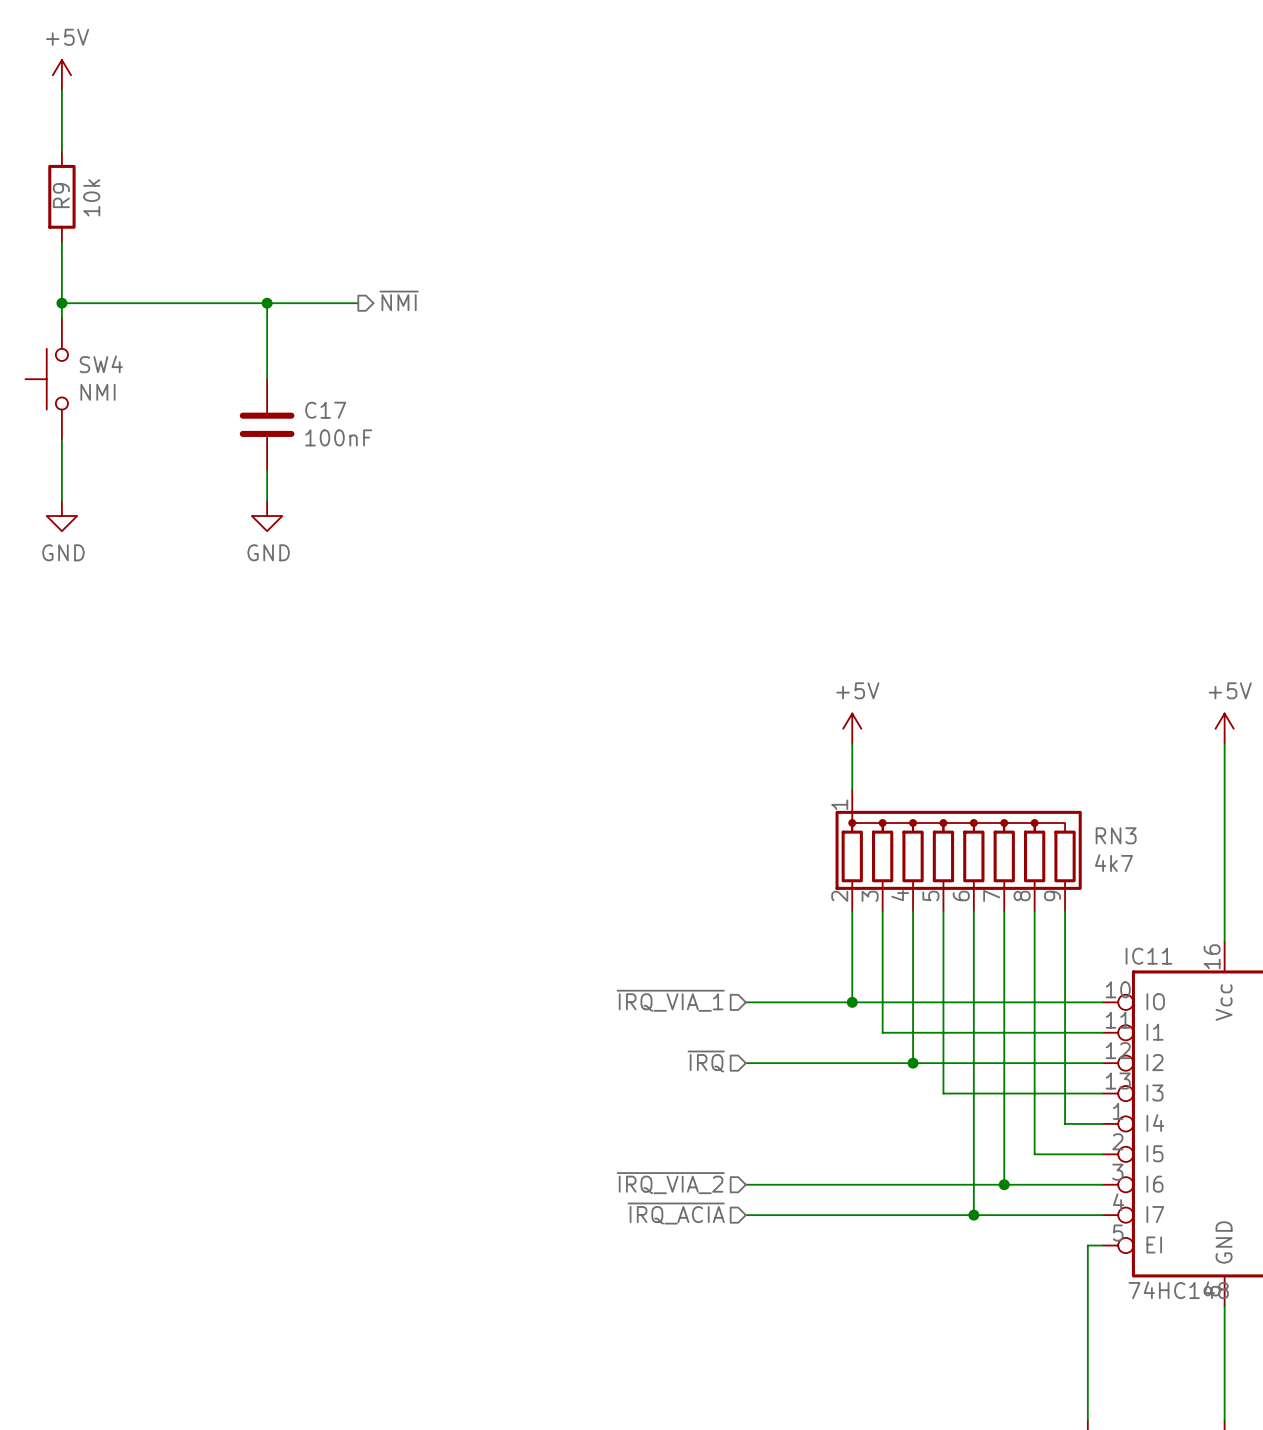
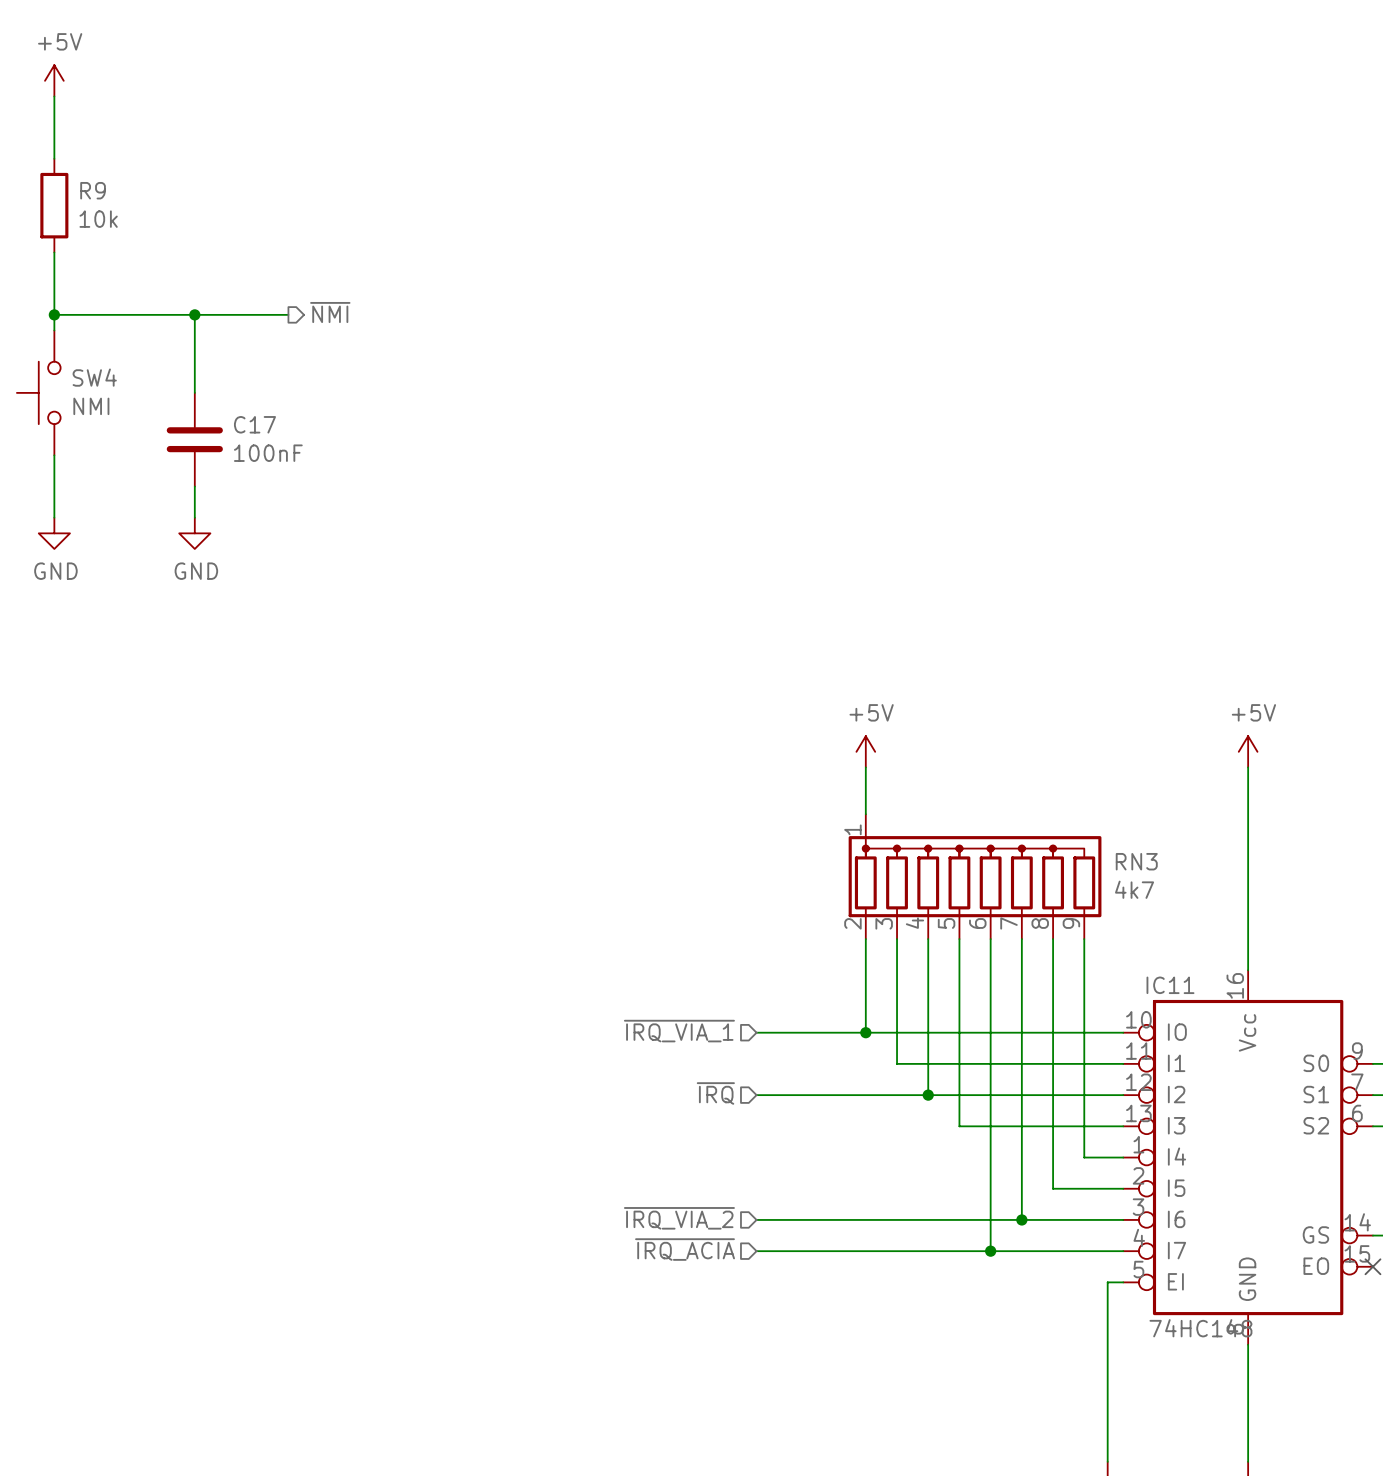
R9 name rotation: 0° (61, 195) -> 90° clockwise (93, 190)
R9 name position: R9 (61, 195) -> R9 (93, 190)
R9 value rotation: 0° (91, 197) -> 90° clockwise (98, 219)
hierarchical label position: ~{NMI} (399, 300) -> ~{NMI} (330, 312)
wire: (267, 303) (267, 379) -> (194, 314) (194, 392)
junction position: (267, 303) -> (194, 314)
wire: (289, 303) (358, 303) -> none
C17 position: (267, 424) -> (194, 439)
wire: (267, 470) (267, 500) -> (194, 486) (194, 517)
power symbol position: GND (267, 515) -> GND (194, 533)

